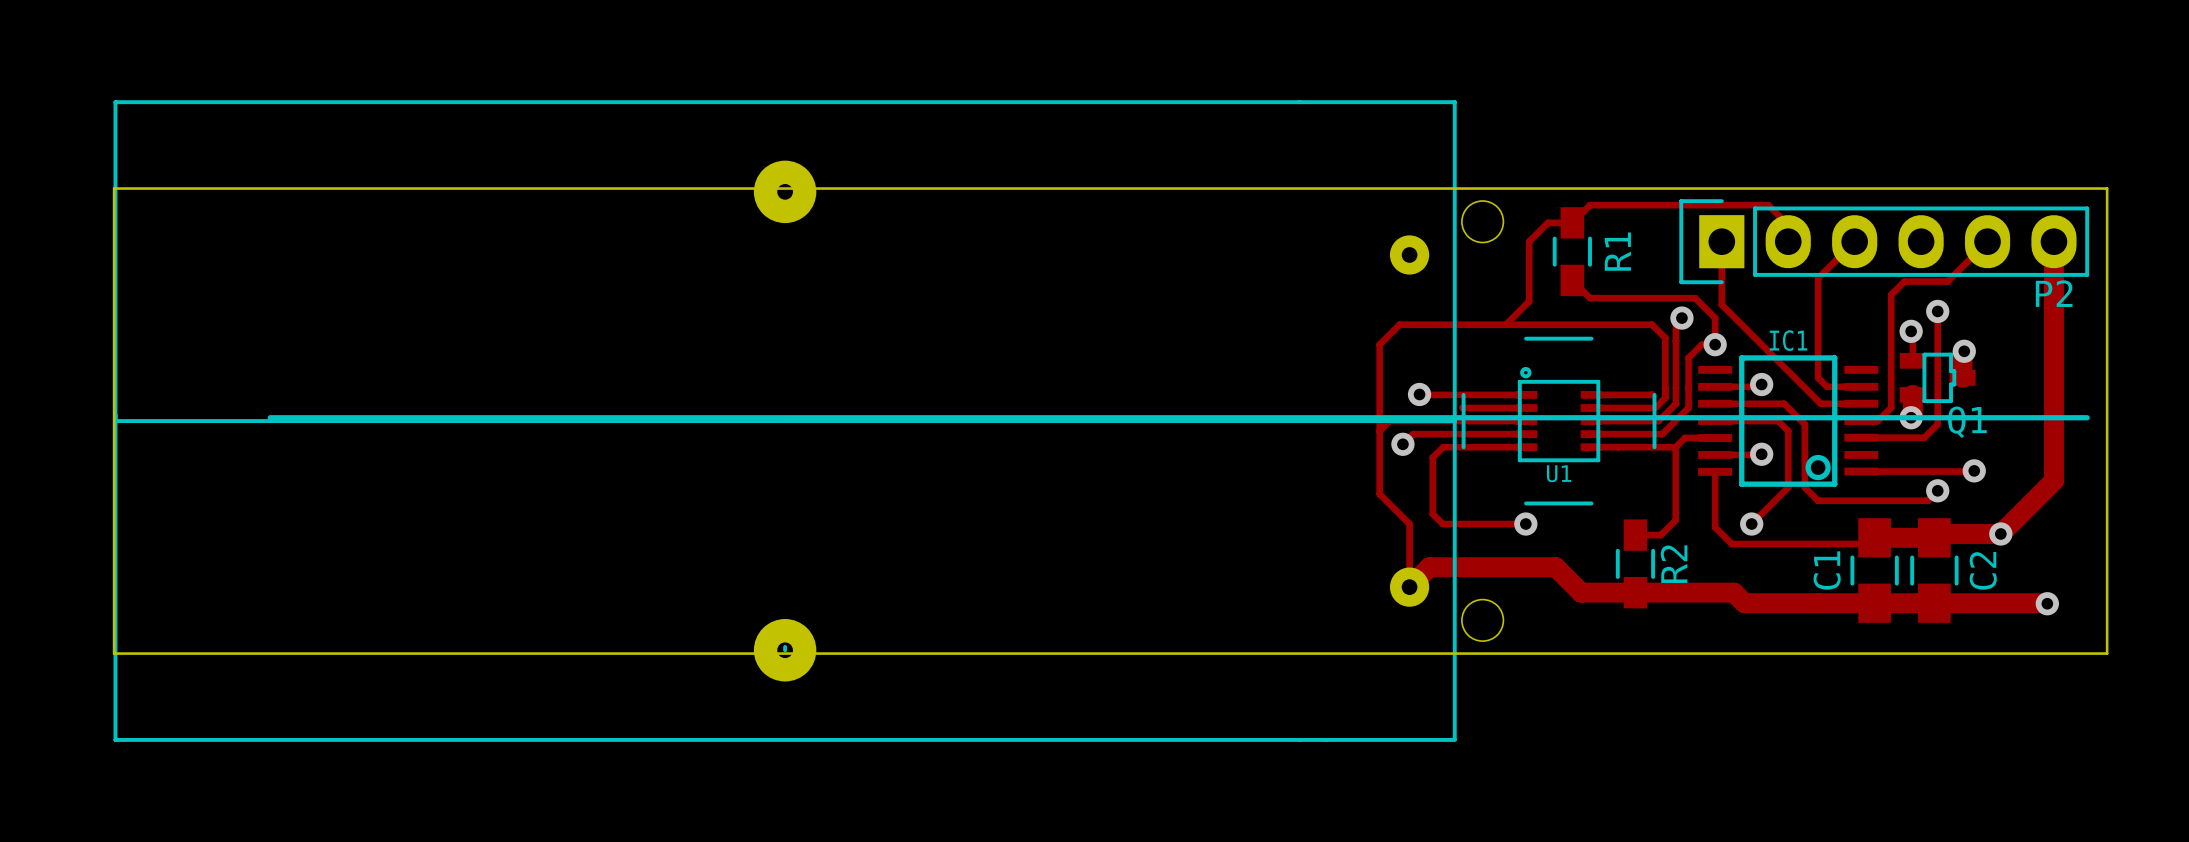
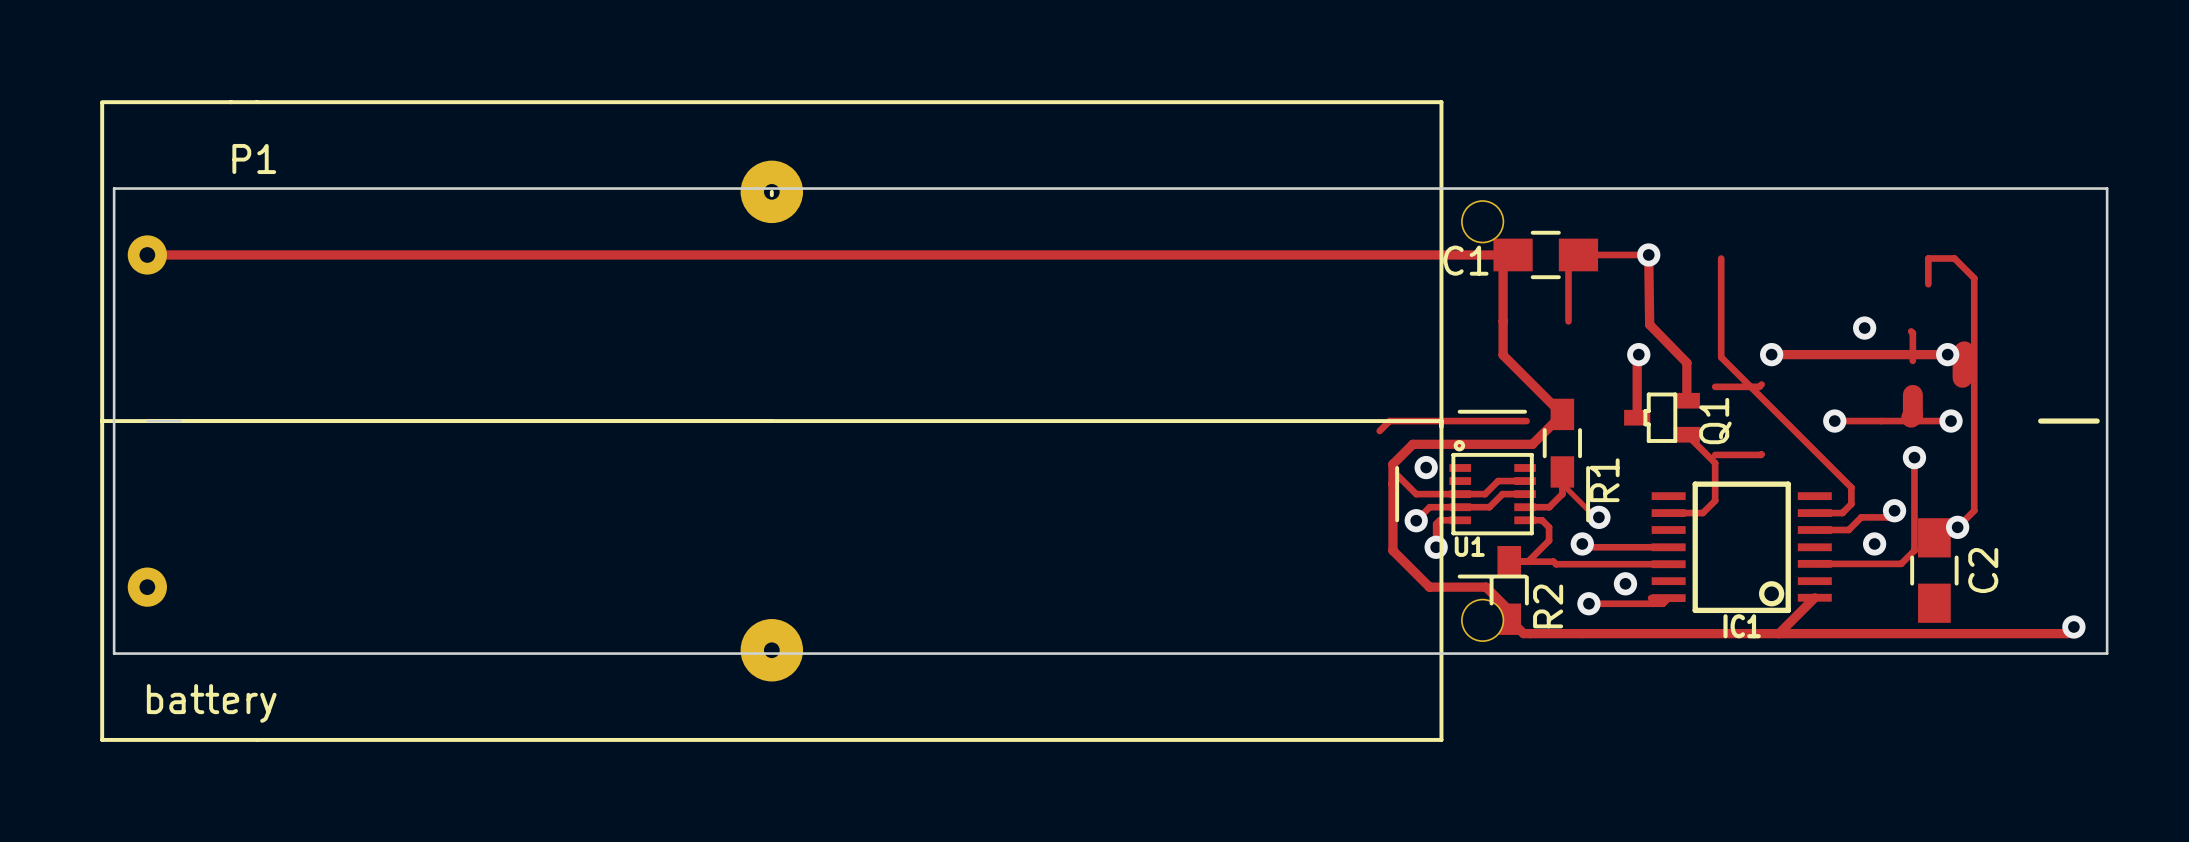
track: (1721, 241) (1721, 304) (1820, 403) (1861, 403) -> none
track: (1788, 241) (1788, 225) (1768, 205) (1590, 205) (1572, 222) (1547, 222) (1529, 241) (1529, 301) (1505, 324) -> none
track: (1854, 241) (1818, 278) (1818, 377) (1827, 386) (1854, 386) -> none
P2: (1884, 241) -> none
track: (1987, 241) (1947, 281) (1904, 281) (1891, 294) (1891, 407) (1877, 421) -> (1951, 421) (1877, 421)
track: (2053, 241) (2053, 480) (2000, 533) (1938, 533) (1934, 537) (1874, 537) (1868, 543) (1731, 543) (1715, 527) (1715, 500) -> (1668, 513) (1702, 513) (1715, 500)
R1 position: (1572, 251) -> (1562, 443)
R1 name position: R1 (1617, 251) -> R1 (1604, 480)
track: none -> (147, 254) (1503, 254)
track: none -> (1503, 254) (1503, 355) (1562, 414) (1532, 444) (1412, 444) (1392, 464)
via: none -> (1648, 254)
track: none -> (1721, 258) (1721, 357) (1851, 487) (1851, 504) (1842, 513) (1814, 513)
track: (1572, 280) (1590, 298) (1695, 298) (1715, 318) (1715, 344) (1701, 344) (1688, 357) (1688, 407) (1662, 434) (1591, 434) -> none
track: none -> (1928, 284) (1928, 258) (1954, 258) (1974, 278) (1974, 510) (1957, 527)
track: (1937, 311) (1937, 424) (1924, 437) (1861, 437) -> none
via: (1937, 311) -> none
track: (1681, 318) (1675, 324) (1675, 403) (1658, 421) (1591, 421) -> none
via: (1681, 318) -> none
track: none -> (1568, 321) (1568, 254) (1648, 254) (1649, 324) (1686, 362) (1686, 400)
via: none -> (1864, 328)
via: (1911, 331) -> none
IC1 name position: IC1 (1788, 340) -> IC1 (1742, 626)
via: (1715, 344) -> none
via position: (1964, 351) -> (1947, 354)
track: none -> (1638, 354) (1637, 356) (1637, 417)
via: none -> (1638, 354)
track: none -> (1771, 354) (1947, 354)
via: none -> (1771, 354)
Q1 rotation: 0° (1937, 377) -> 180° (1662, 417)
Q1 position: (1937, 377) -> (1662, 417)
via: (1761, 384) -> none
track: (1419, 394) (1526, 394) -> none
via: (1419, 394) -> none
track: (1652, 394) (1591, 394) -> none
track: (1708, 403) (1784, 403) (1804, 424) (1804, 487) (1818, 500) (1927, 500) (1937, 490) -> none
track: (1462, 407) (1526, 407) -> none
track: (1591, 407) (1655, 407) (1665, 397) (1665, 338) (1652, 324) (1399, 324) (1379, 344) (1379, 494) (1409, 524) (1409, 587) (1429, 567) (1555, 567) (1581, 592) (1733, 592) (1744, 603) (2047, 603) -> none
line: (270, 417) (2087, 417) -> none
via: (1911, 417) -> none
board edge: none -> (147, 421) (180, 421)
P1: none -> battery (771, 421)
part: (785, 421) -> none
U1 position: (1559, 421) -> (1492, 494)
track: (1715, 421) (1778, 421) (1788, 431) (1788, 487) (1751, 524) -> none
IC1 position: (1788, 421) -> (1741, 547)
track: none -> (1834, 421) (1861, 421)
via: none -> (1834, 421)
via: none -> (1951, 421)
line: none -> (2040, 421) (2097, 421)
track: (1526, 434) (1413, 434) (1402, 444) -> none
track: none -> (1686, 434) (1715, 463) (1715, 471)
track: (1715, 437) (1684, 437) (1675, 447) -> none
via position: (1402, 444) -> (1426, 467)
track: (1526, 447) (1443, 447) (1432, 457) (1432, 514) (1442, 524) (1525, 524) -> none
track: (1591, 447) (1675, 447) -> none
track: (1675, 447) (1675, 520) (1660, 535) (1635, 535) -> none
via: (1761, 454) -> none
track: none -> (1914, 457) (1914, 550) (1901, 563) (1814, 563)
via: none -> (1914, 457)
track: none -> (1392, 464) (1392, 550) (1429, 587) (1485, 587) (1509, 610) (1509, 619) (1523, 633) (2067, 633) (2073, 626)
track: none -> (1392, 464) (1392, 470) (1416, 494) (1485, 494) (1498, 481) (1525, 481)
track: (1974, 470) (1854, 471) -> none
via: (1974, 470) -> none
U1 name position: U1 (1559, 473) -> U1 (1469, 546)
via: (1937, 490) -> none
track: none -> (1525, 494) (1502, 494) (1489, 507) (1429, 507) (1416, 520)
track: none -> (1525, 507) (1549, 507) (1562, 494) (1562, 471) (1562, 484) (1595, 517)
track: none -> (1894, 510) (1887, 517) (1861, 517) (1848, 530) (1814, 530)
via: none -> (1894, 510)
via: none -> (1598, 517)
via: none -> (1416, 520)
track: none -> (1460, 520) (1439, 520) (1436, 524) (1436, 547) (1432, 543)
track: none -> (1525, 520) (1542, 520) (1549, 527) (1549, 540) (1528, 561)
via: (1525, 524) -> none
via: (1751, 524) -> none
via: none -> (1957, 527)
via: (2000, 533) -> none
track: none -> (1582, 543) (1585, 547) (1668, 547)
via: none -> (1582, 543)
via: none -> (1874, 543)
via: none -> (1436, 547)
track: none -> (1509, 561) (1553, 561) (1556, 564) (1668, 564)
R2 position: (1635, 563) -> (1509, 590)
R2 name position: R2 (1674, 564) -> R2 (1548, 606)
C1 rotation: 0° (1874, 570) -> 90° clockwise (1545, 254)
C1 position: (1874, 570) -> (1545, 254)
via: none -> (1625, 583)
track: none -> (1814, 597) (1778, 633)
track: none -> (1651, 598) (1668, 598) (1663, 603) (1588, 603)
via: none -> (1588, 603)
via position: (2047, 603) -> (2073, 626)

